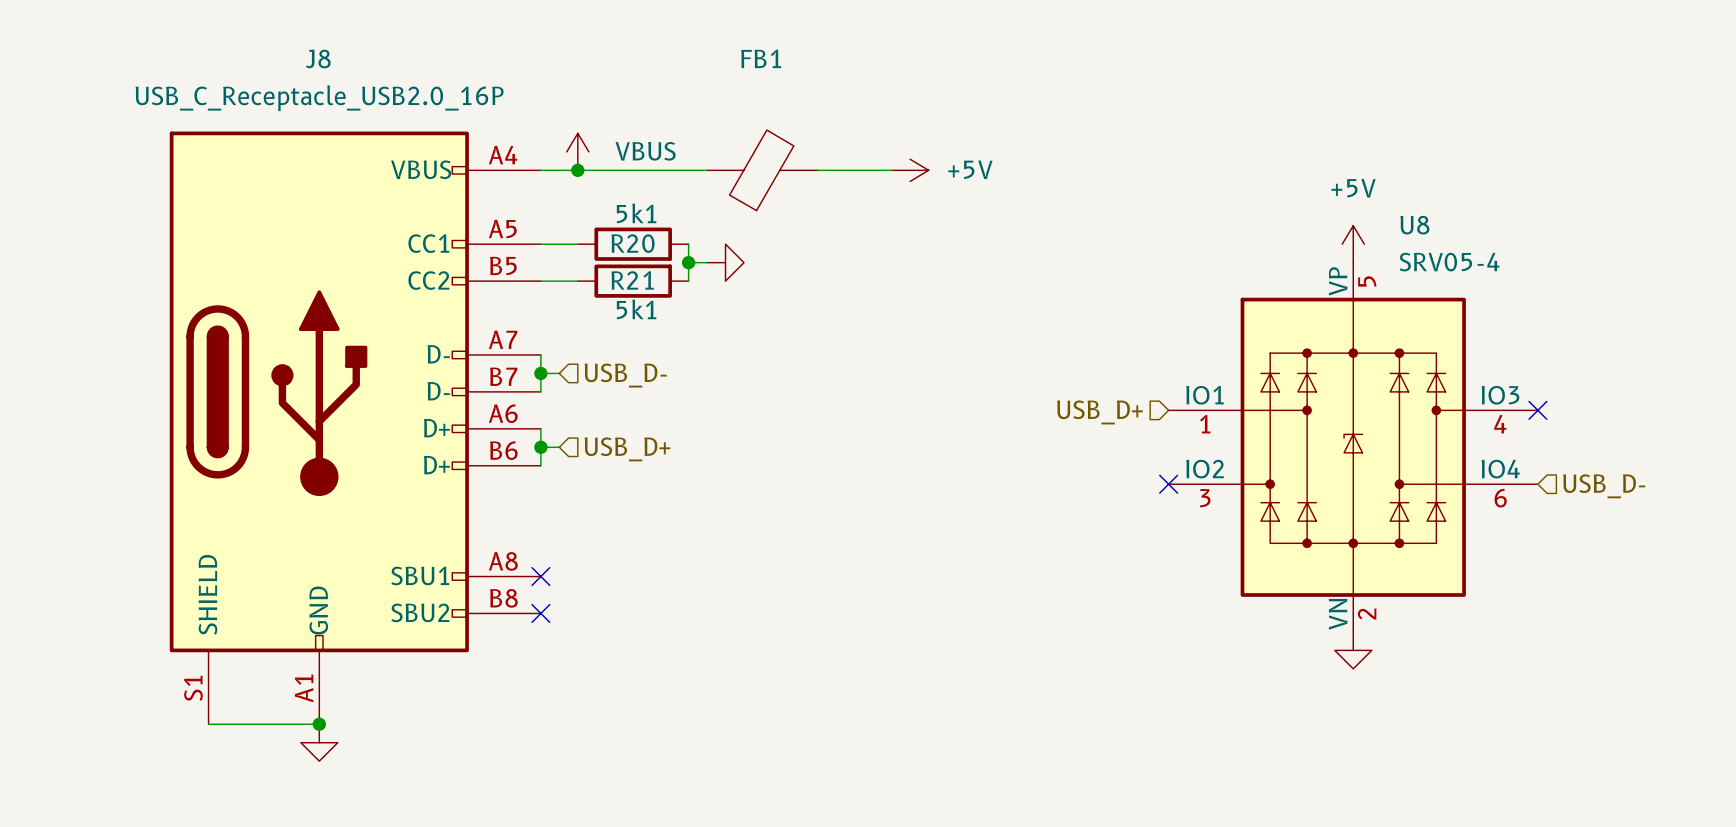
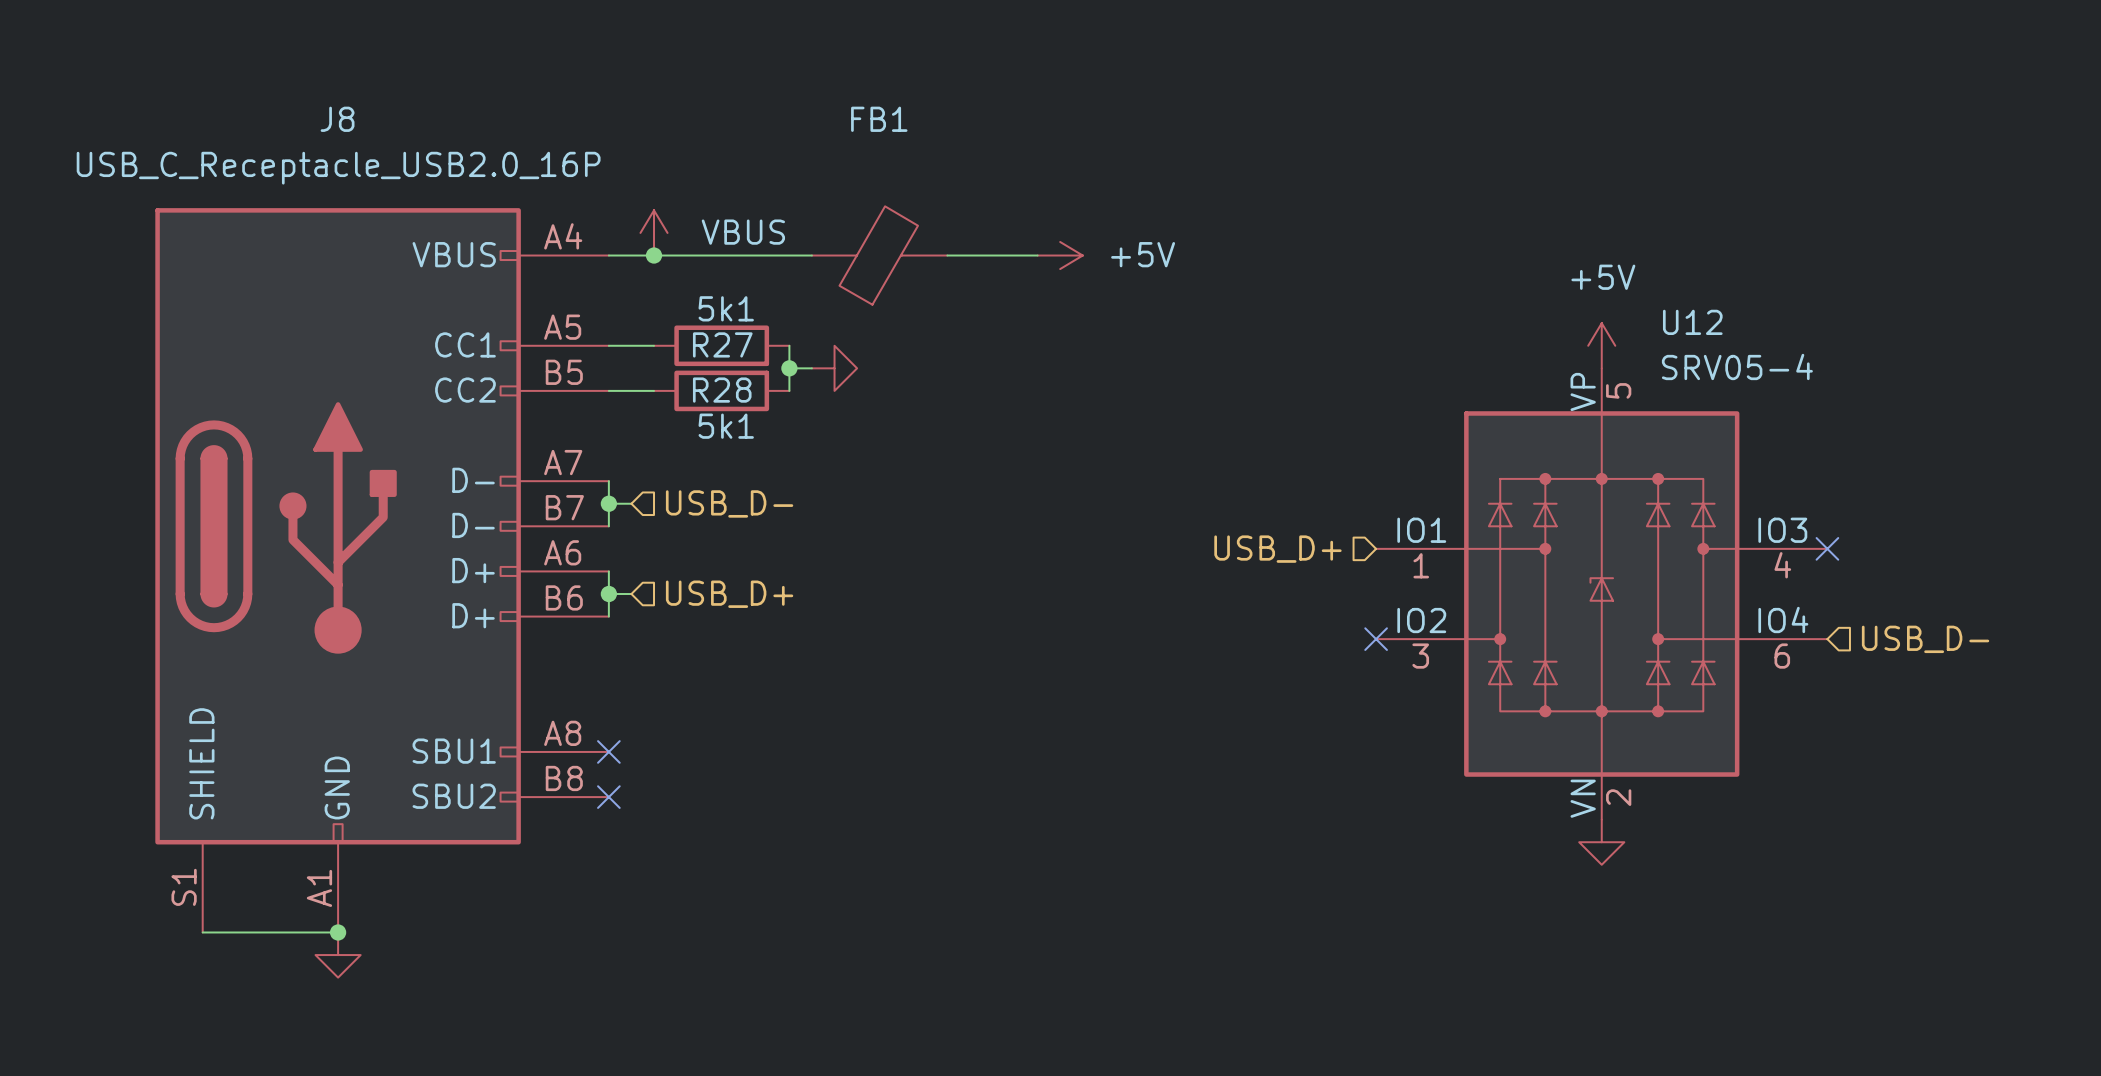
U8 name: U8 (1414, 225) -> U12 (1692, 322)
R20 name: R20 (632, 243) -> R27 (722, 344)
R21 name: R21 (632, 280) -> R28 (722, 390)

